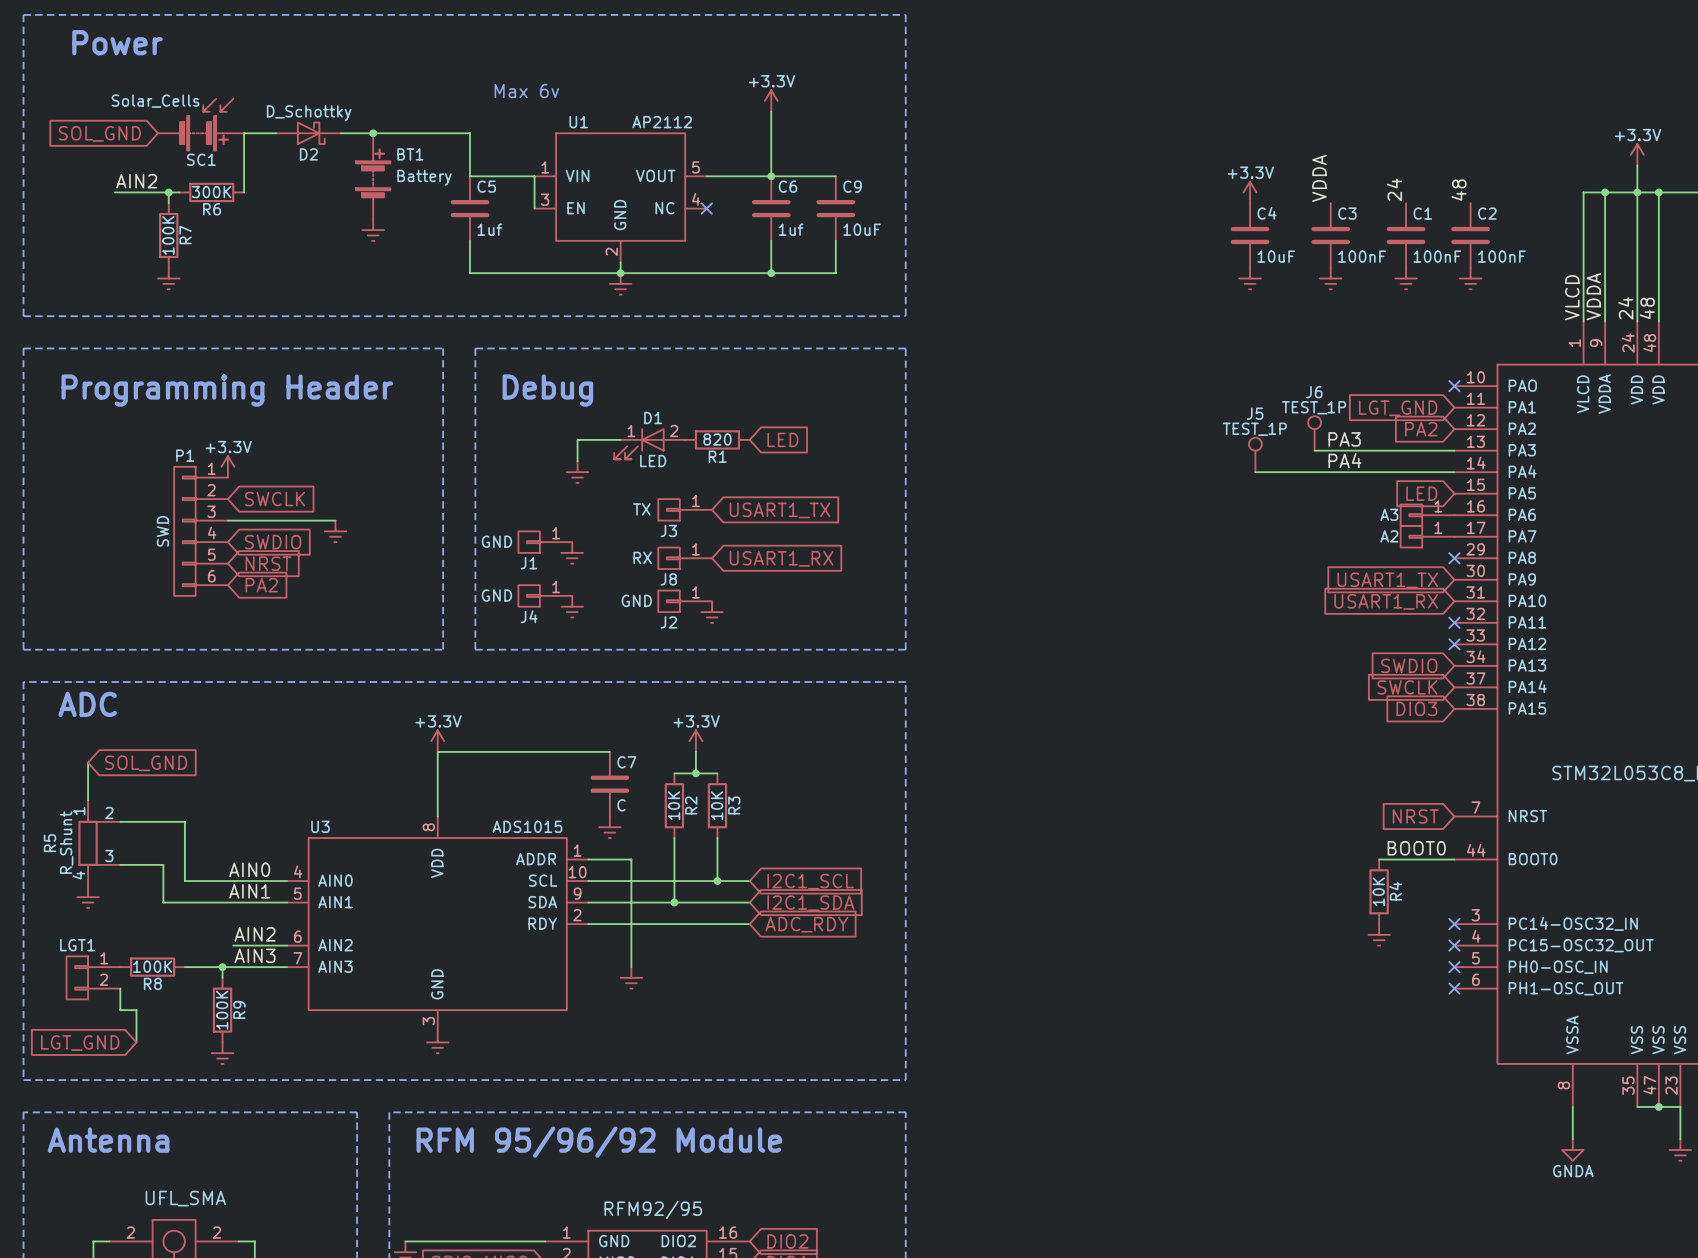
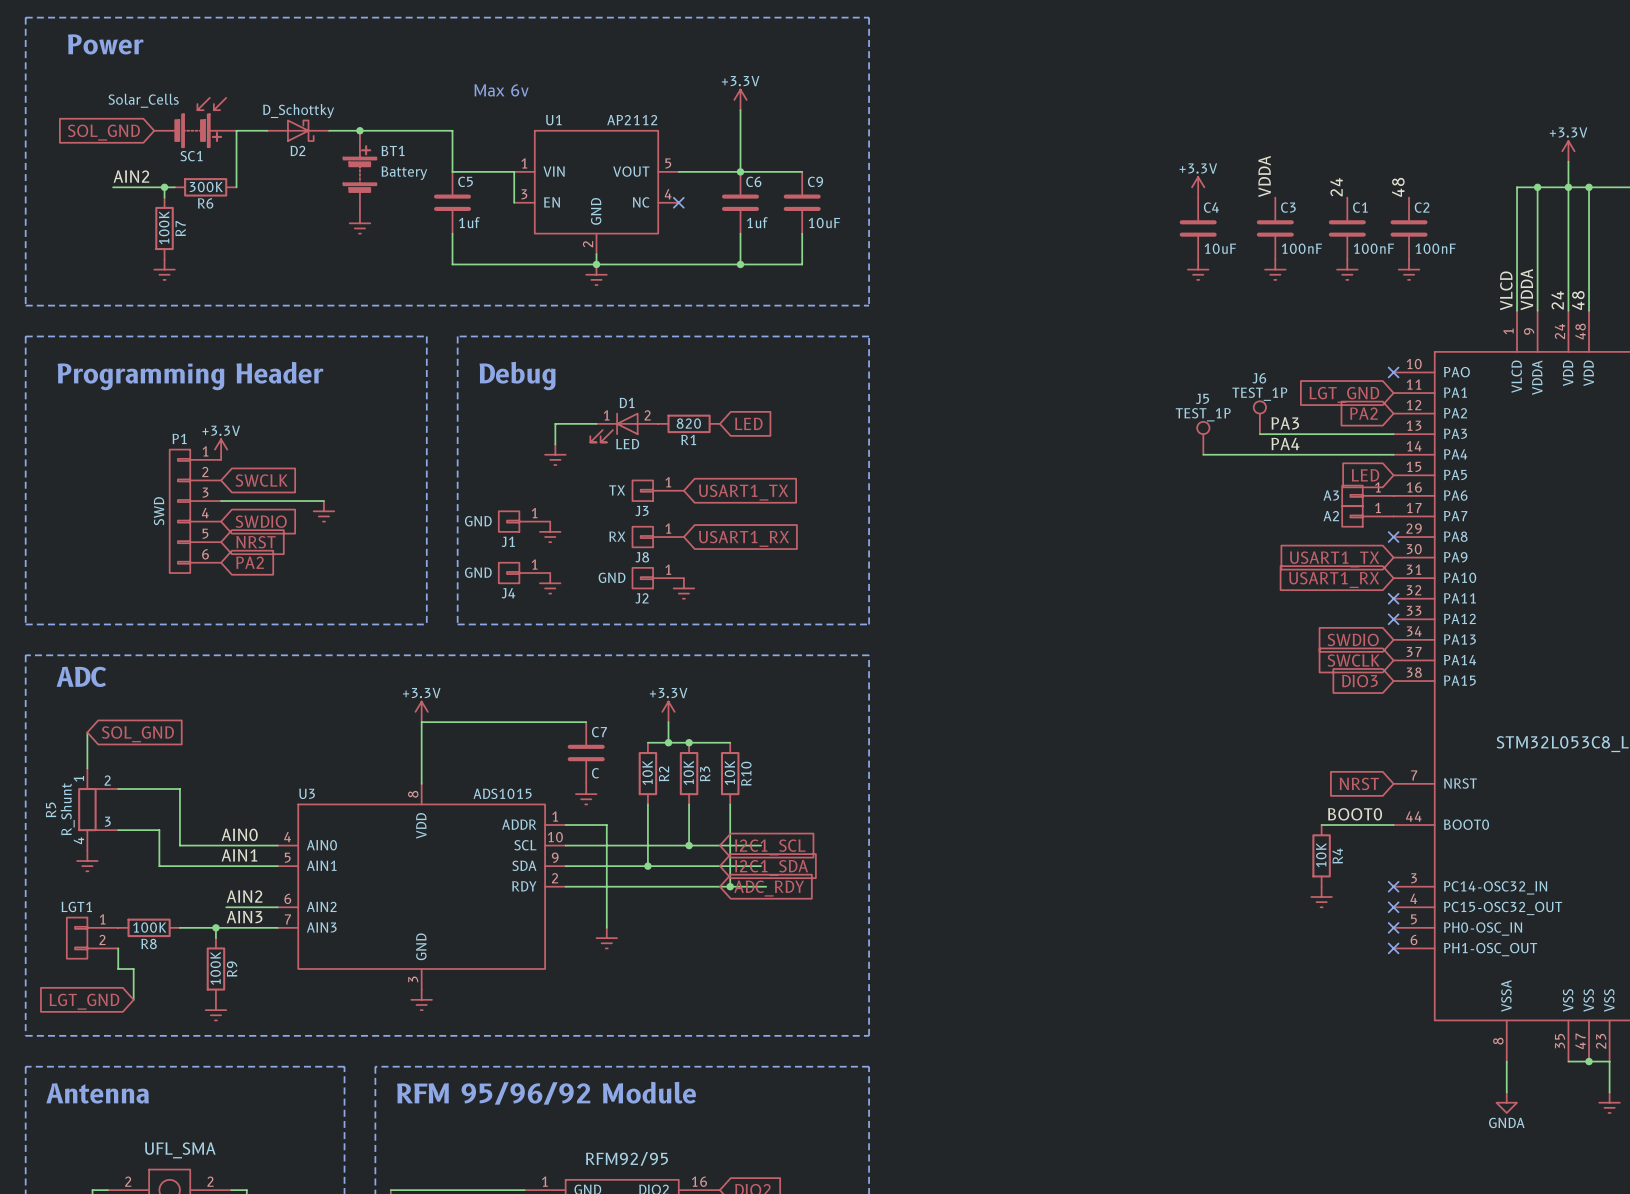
wire: none -> (689, 742) (730, 742)
junction: none -> (689, 742)
R10: none -> 10K (730, 773)
wire: none -> (730, 804) (730, 886)
wire: none -> (719, 845) (761, 845)
wire: none -> (719, 866) (761, 866)
wire: none -> (719, 886) (766, 886)
junction: none -> (730, 886)

